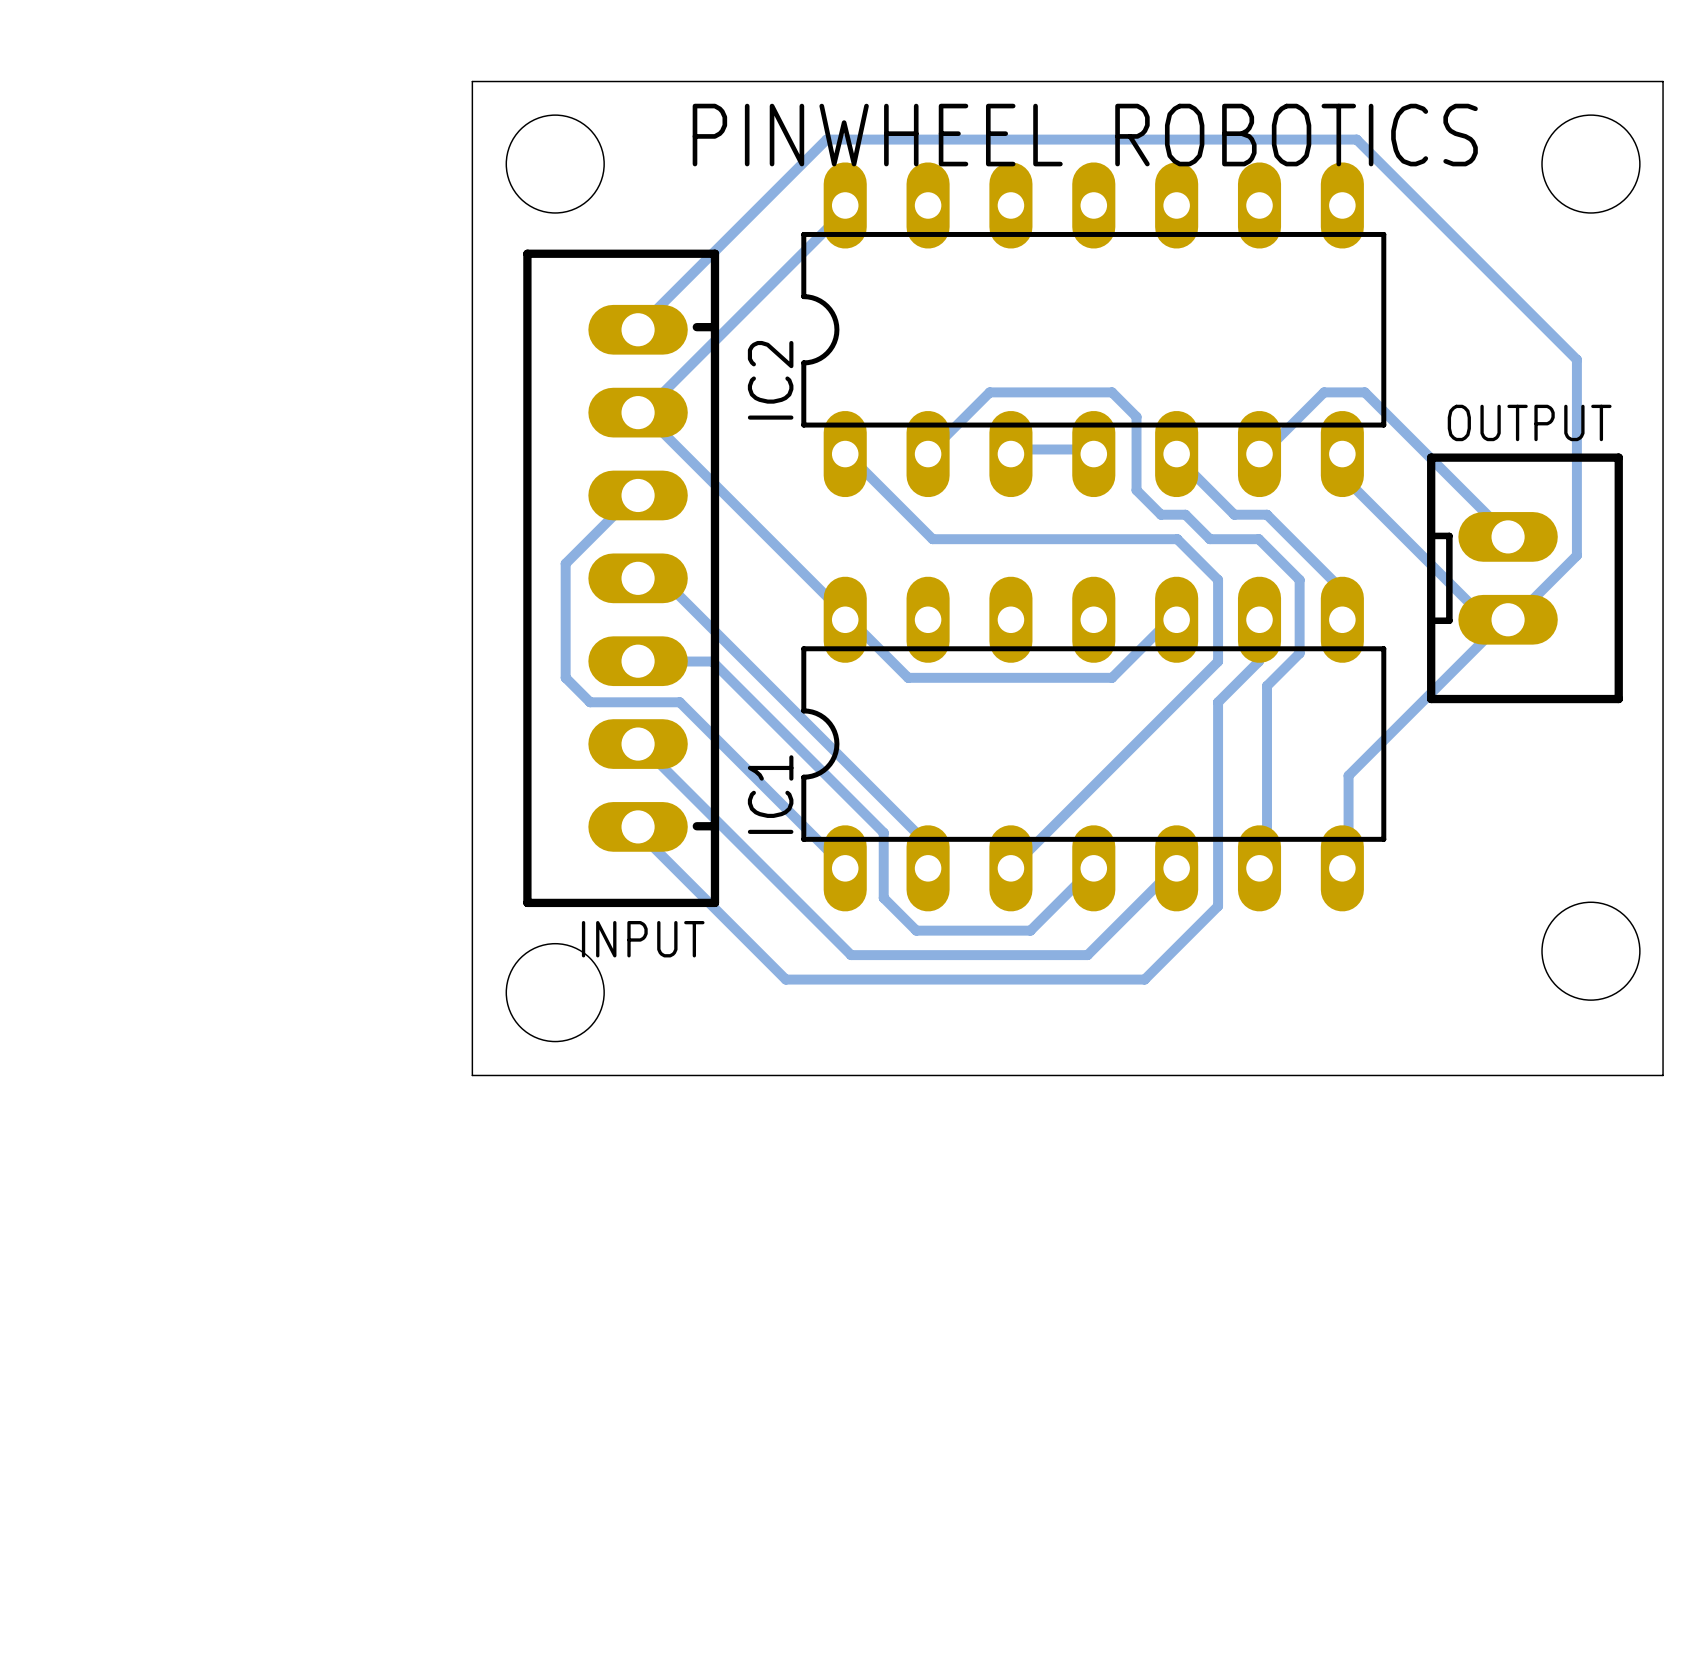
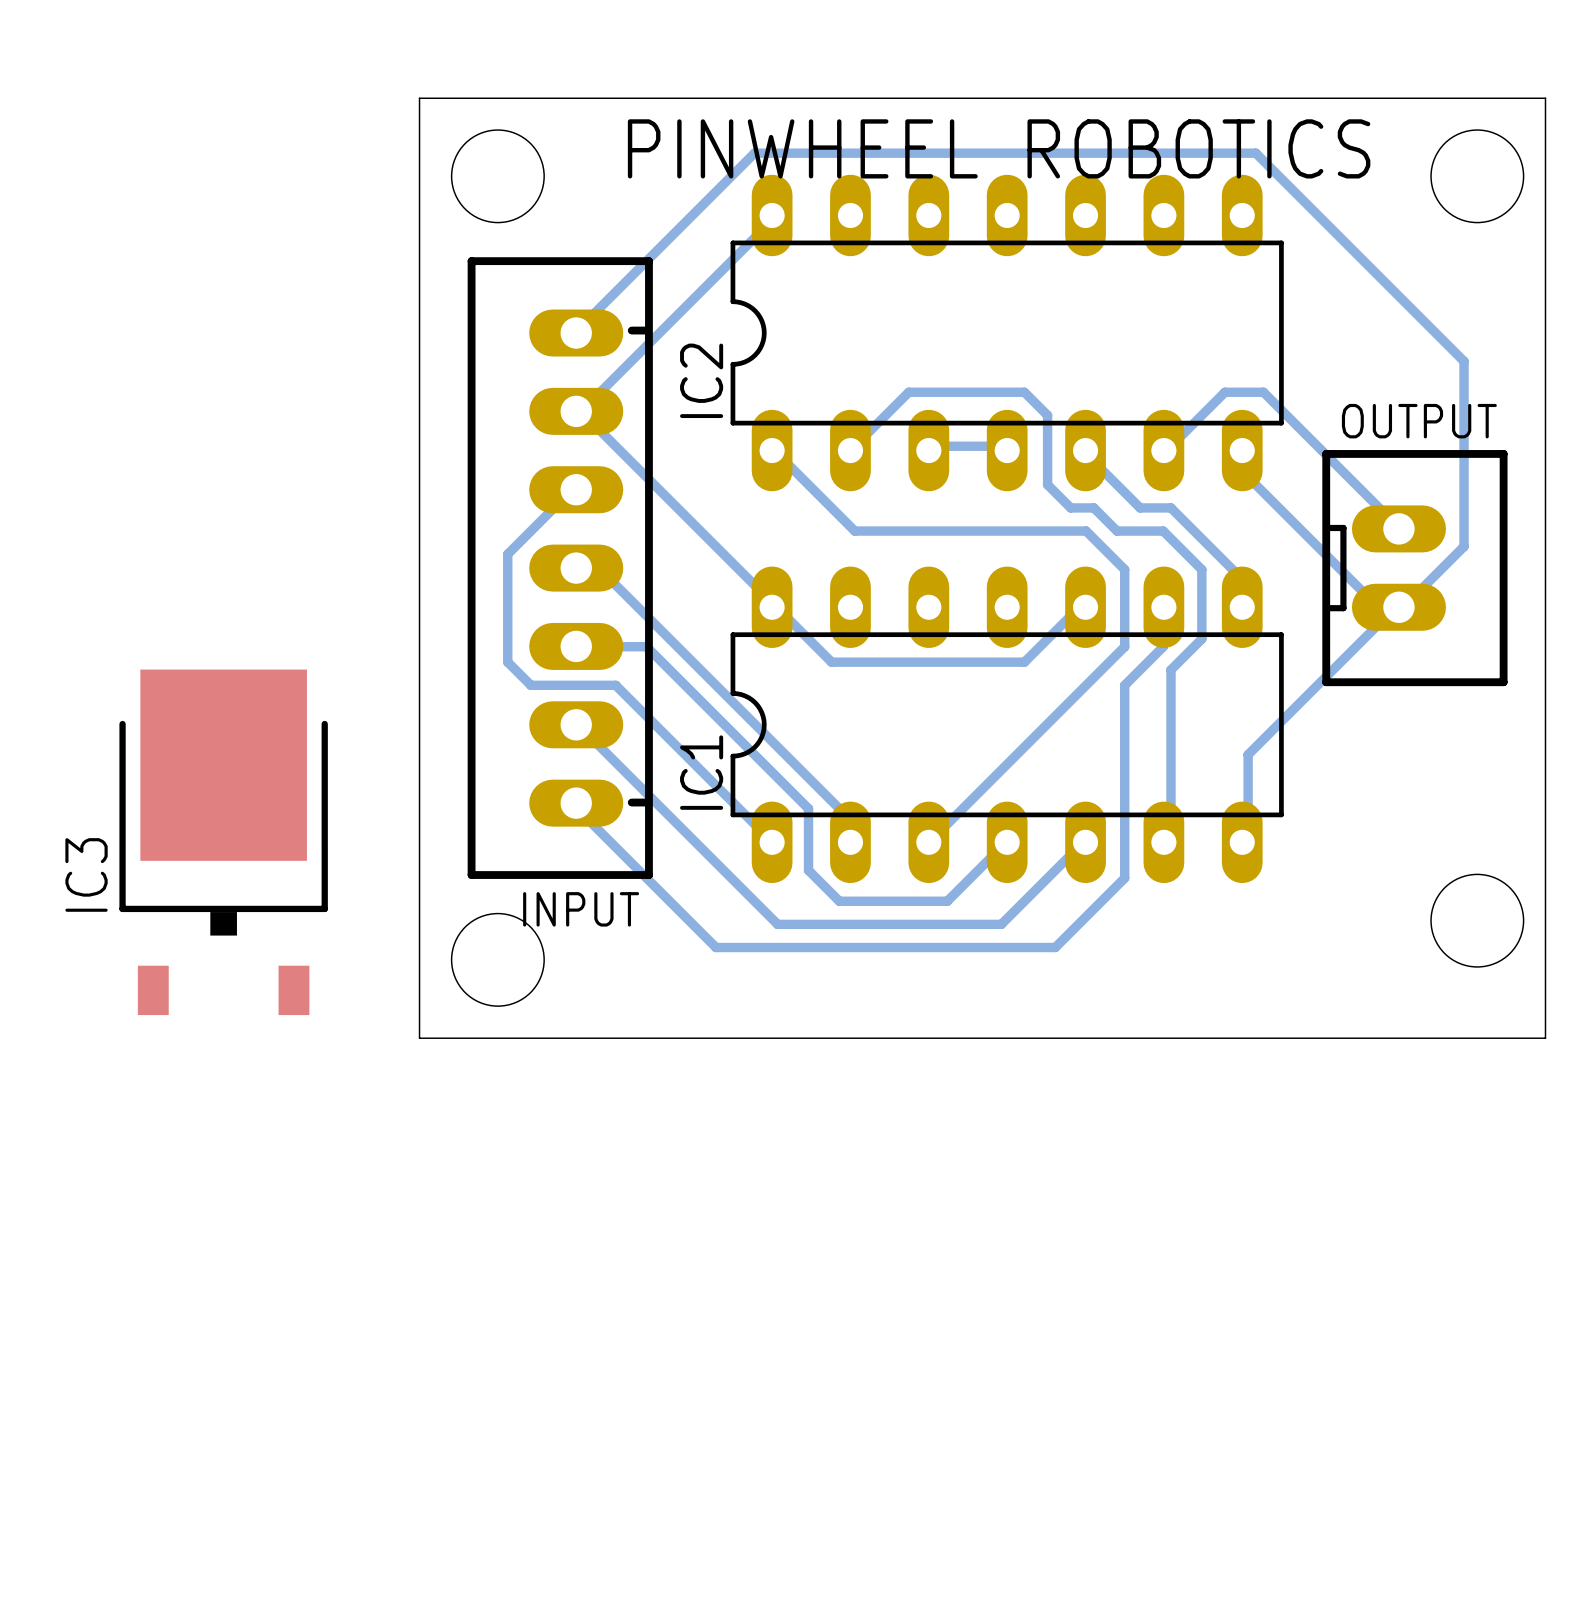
IC3: none -> (223, 842)

